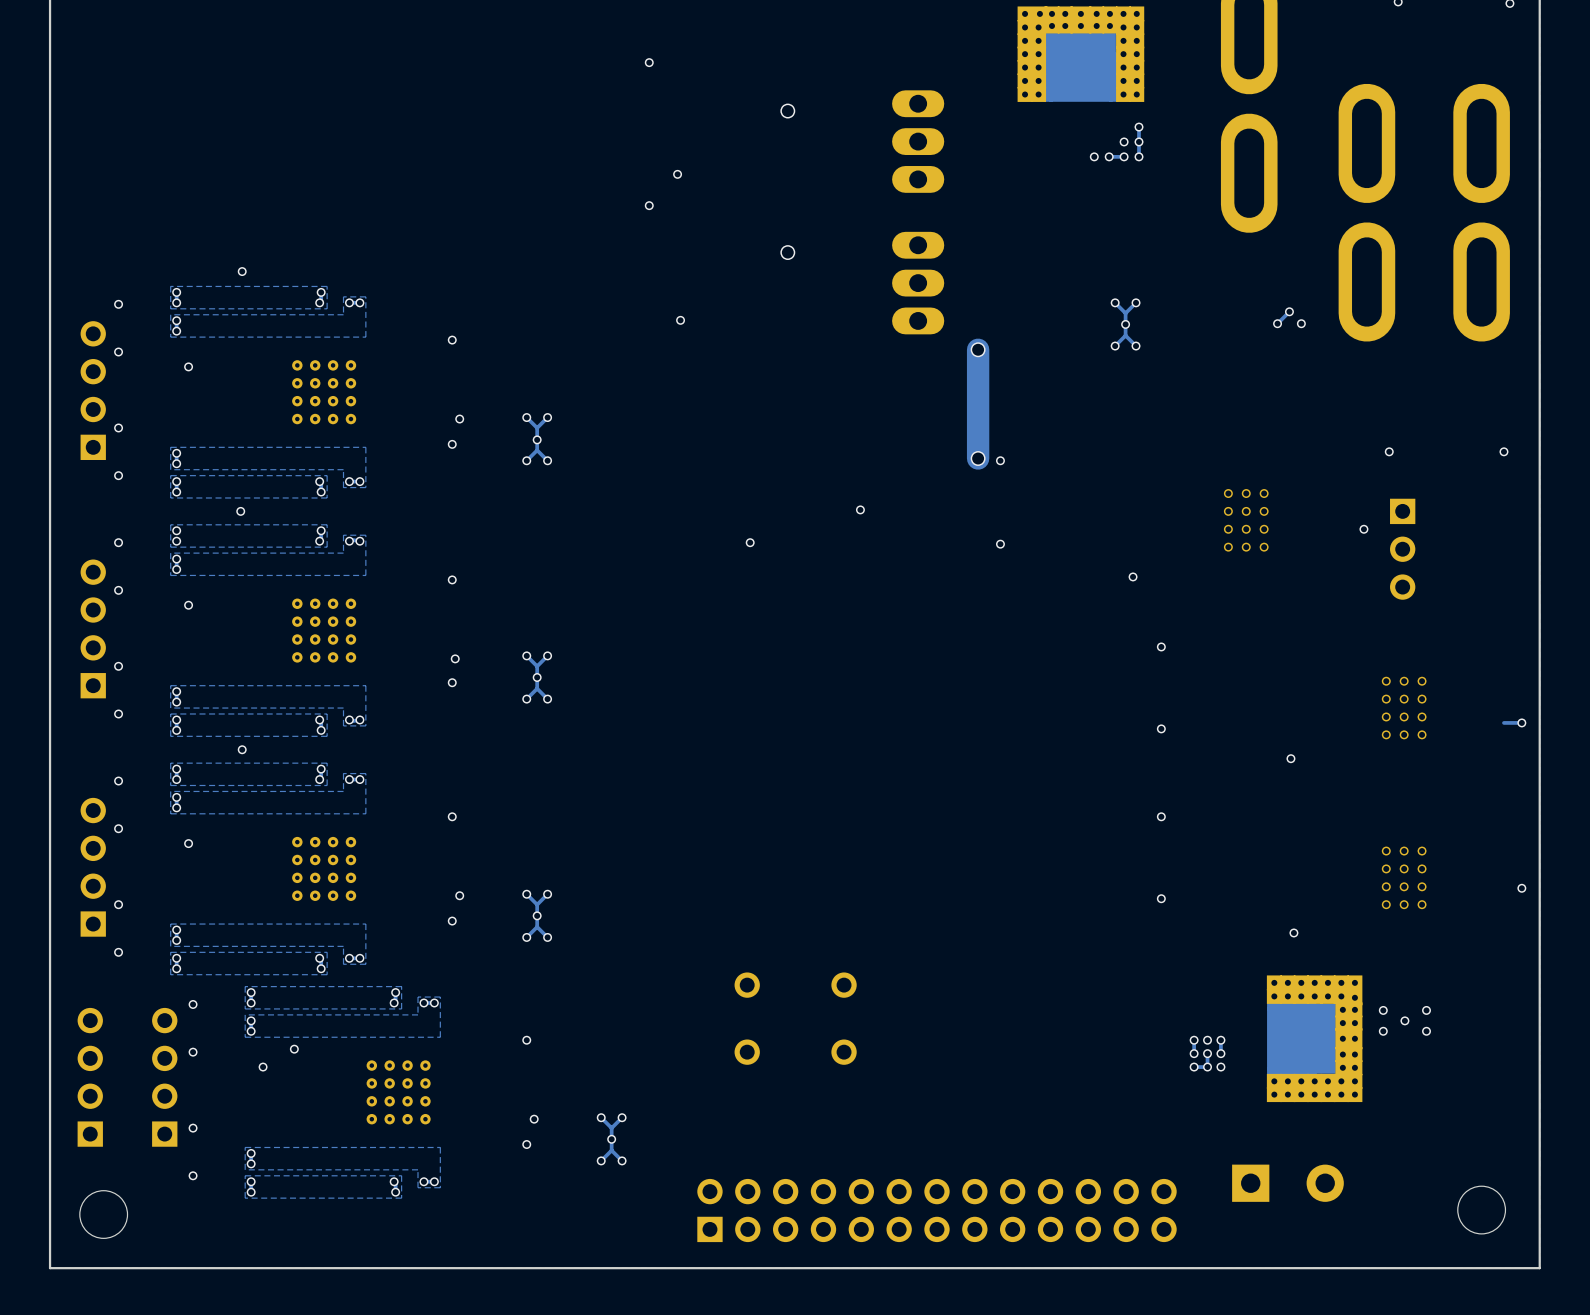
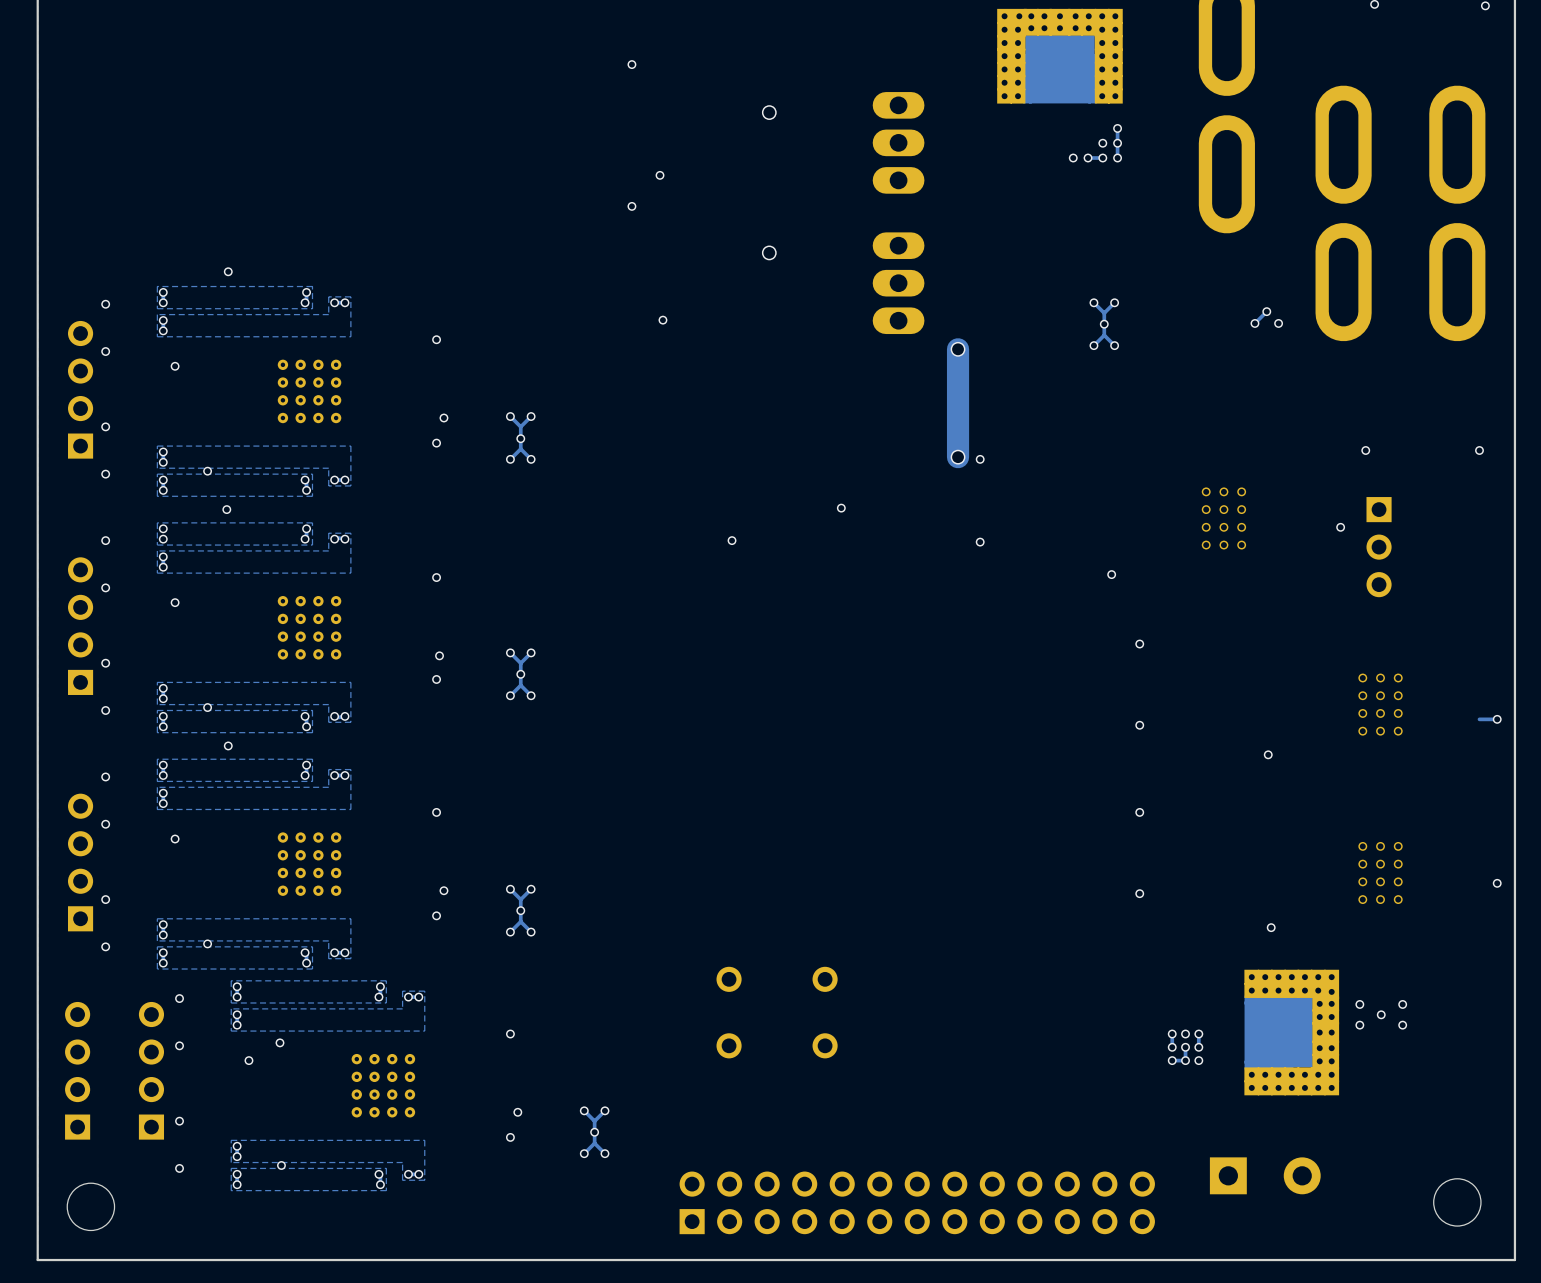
via: none -> (207, 471)
via: none -> (207, 707)
via: none -> (207, 943)
via: none -> (281, 1165)

